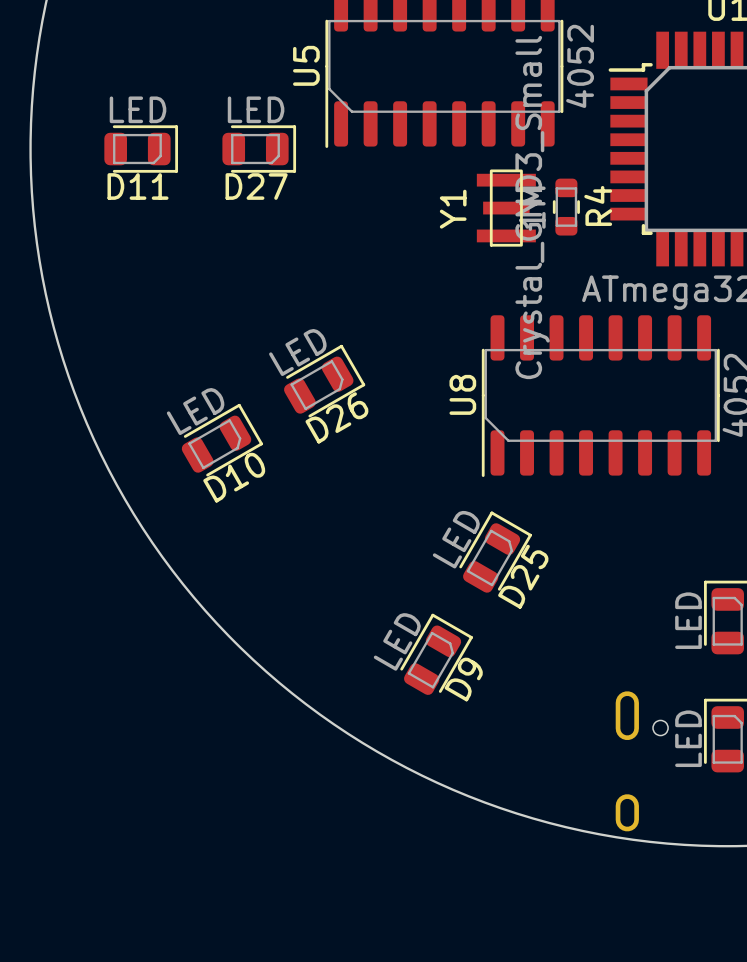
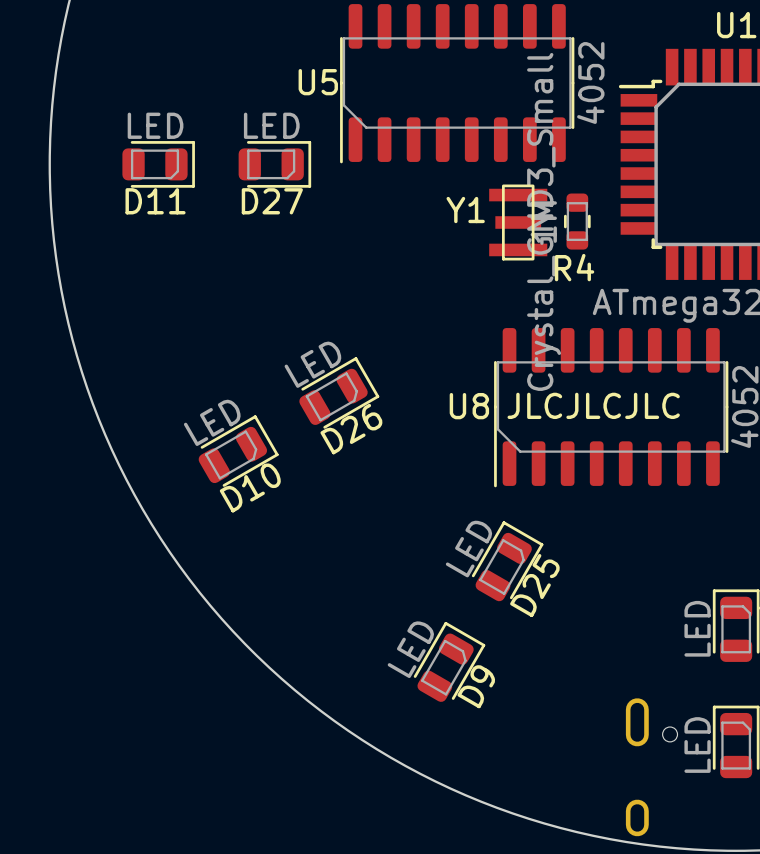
U5 name rotation: 0° (306, 65) -> 90° clockwise (318, 82)
R4 name rotation: 0° (598, 205) -> 90° clockwise (574, 267)
R4 name position: R4 (598, 205) -> R4 (574, 267)
Y1 name rotation: 0° (453, 209) -> 90° clockwise (465, 210)
U8 name rotation: 0° (462, 394) -> 90° clockwise (469, 406)
text: none -> JLCJLCJLC (593, 405)

